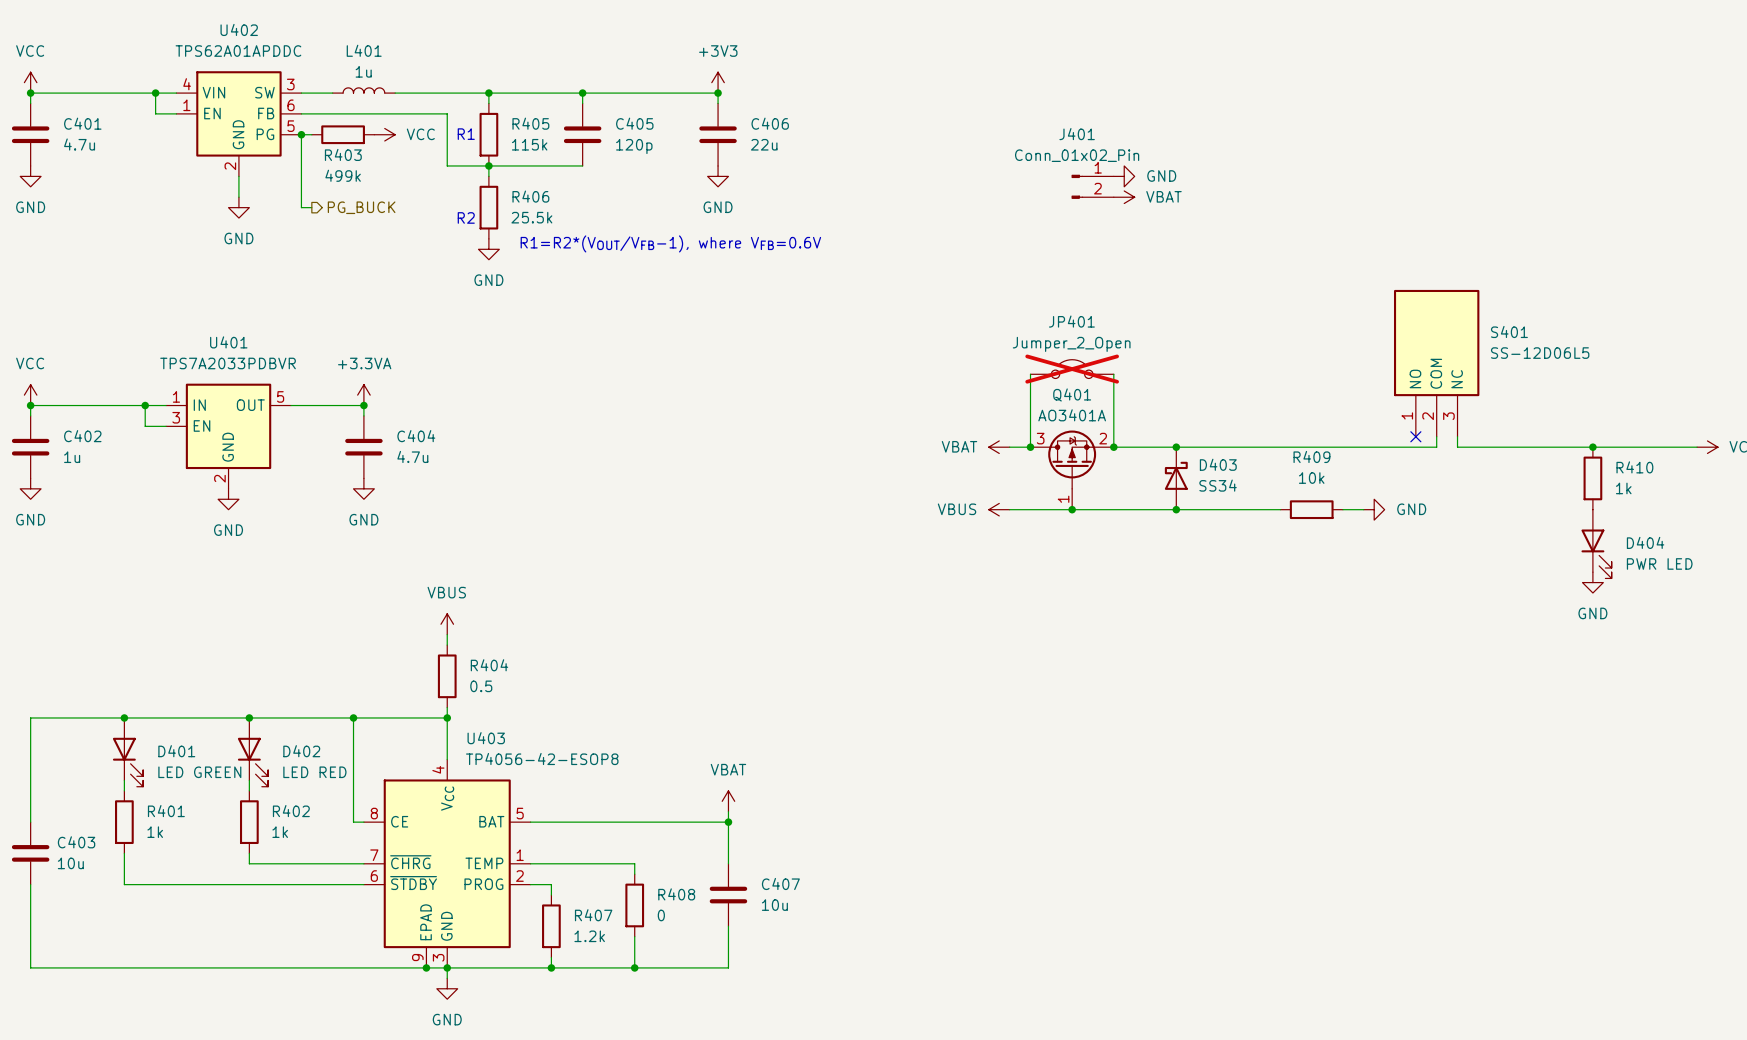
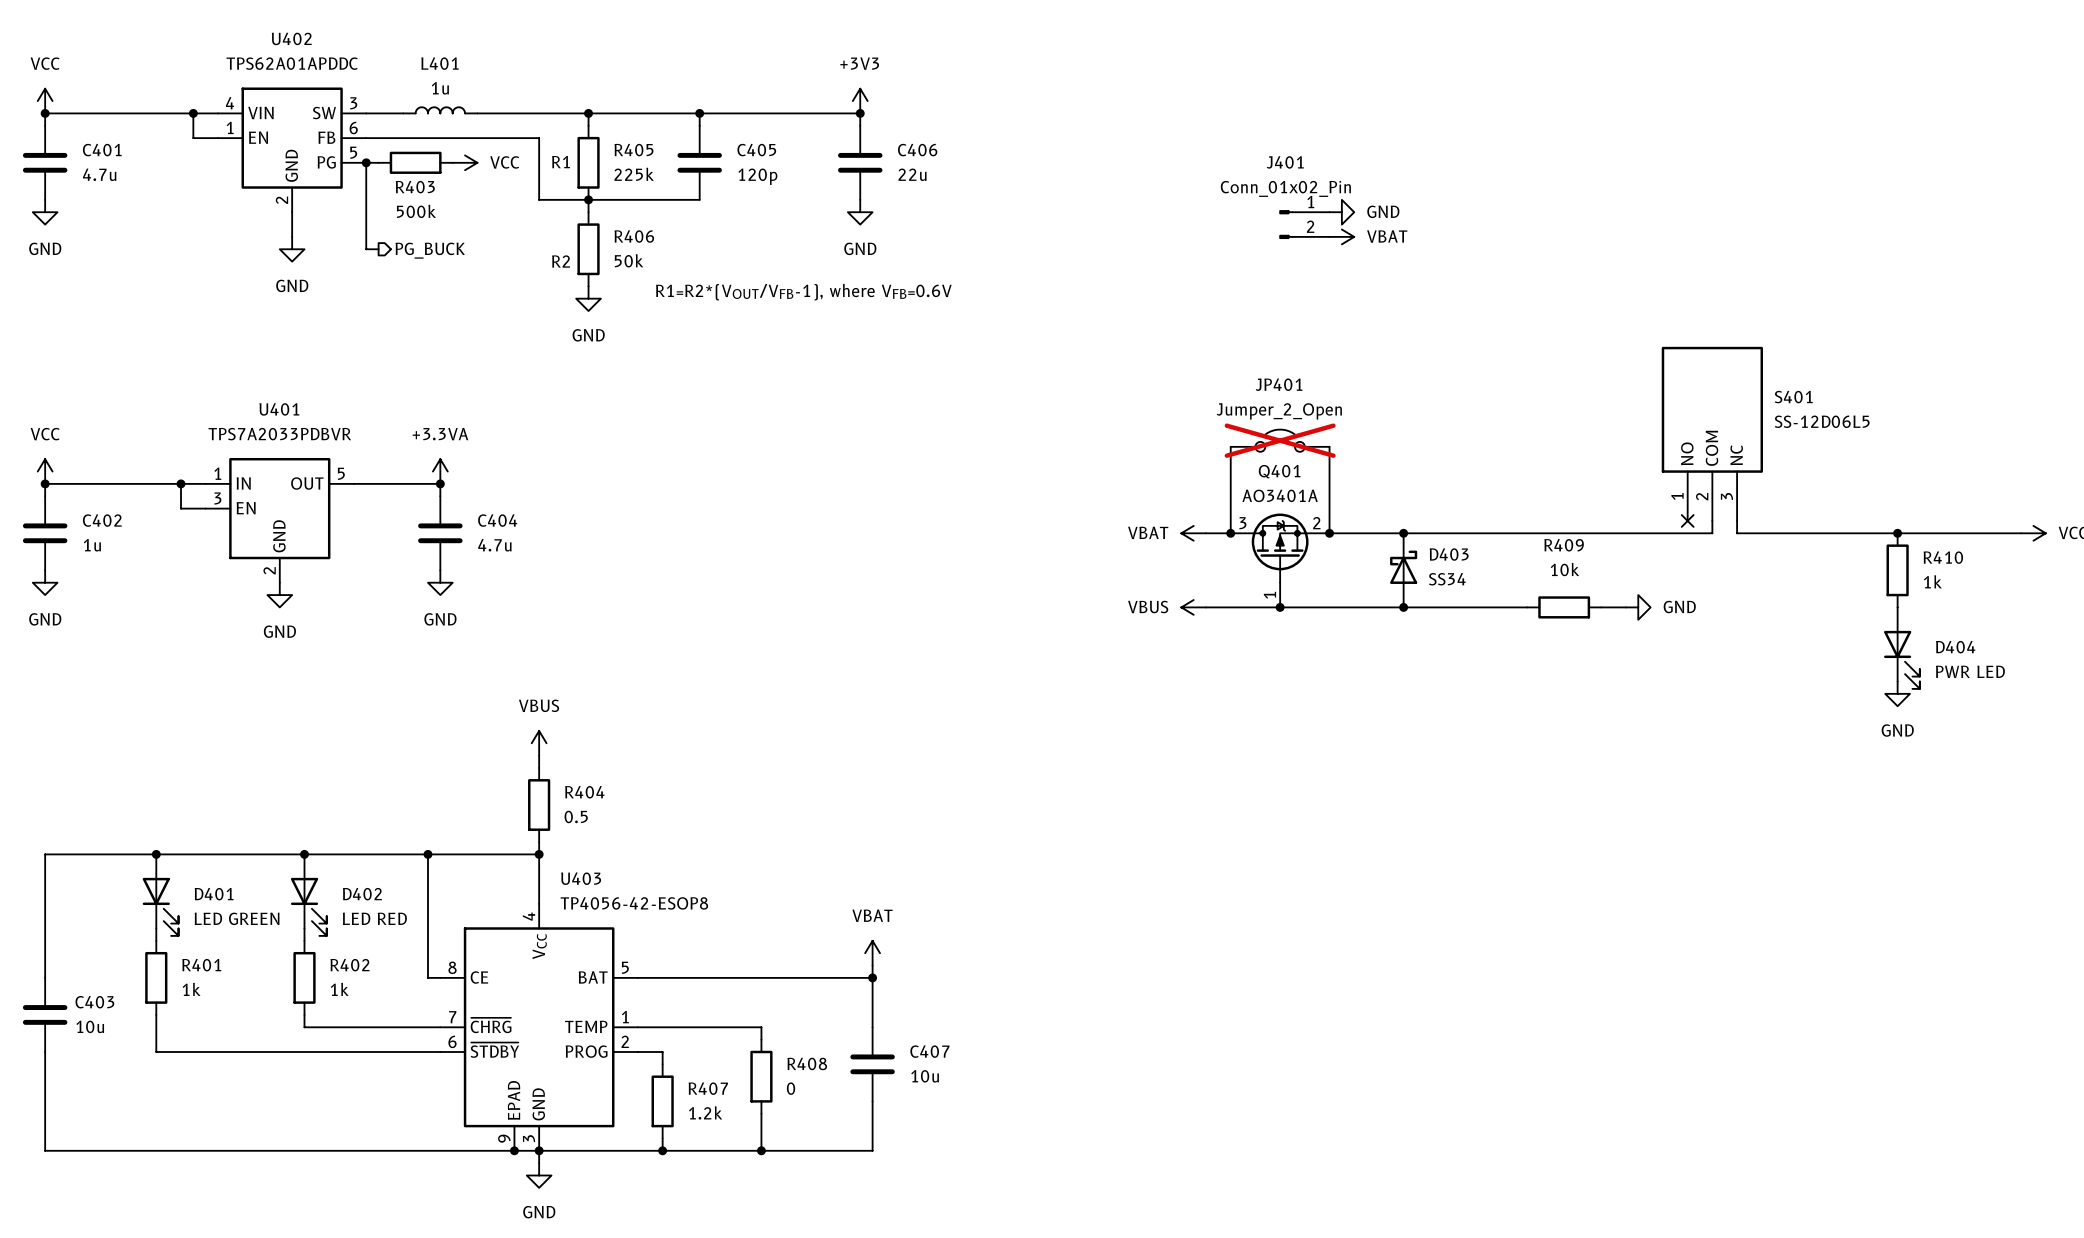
R405 value: 115k (529, 144) -> 225k (634, 174)
R403 value: 499k (343, 175) -> 500k (416, 211)
R406 value: 25.5k (531, 217) -> 50k (629, 260)

